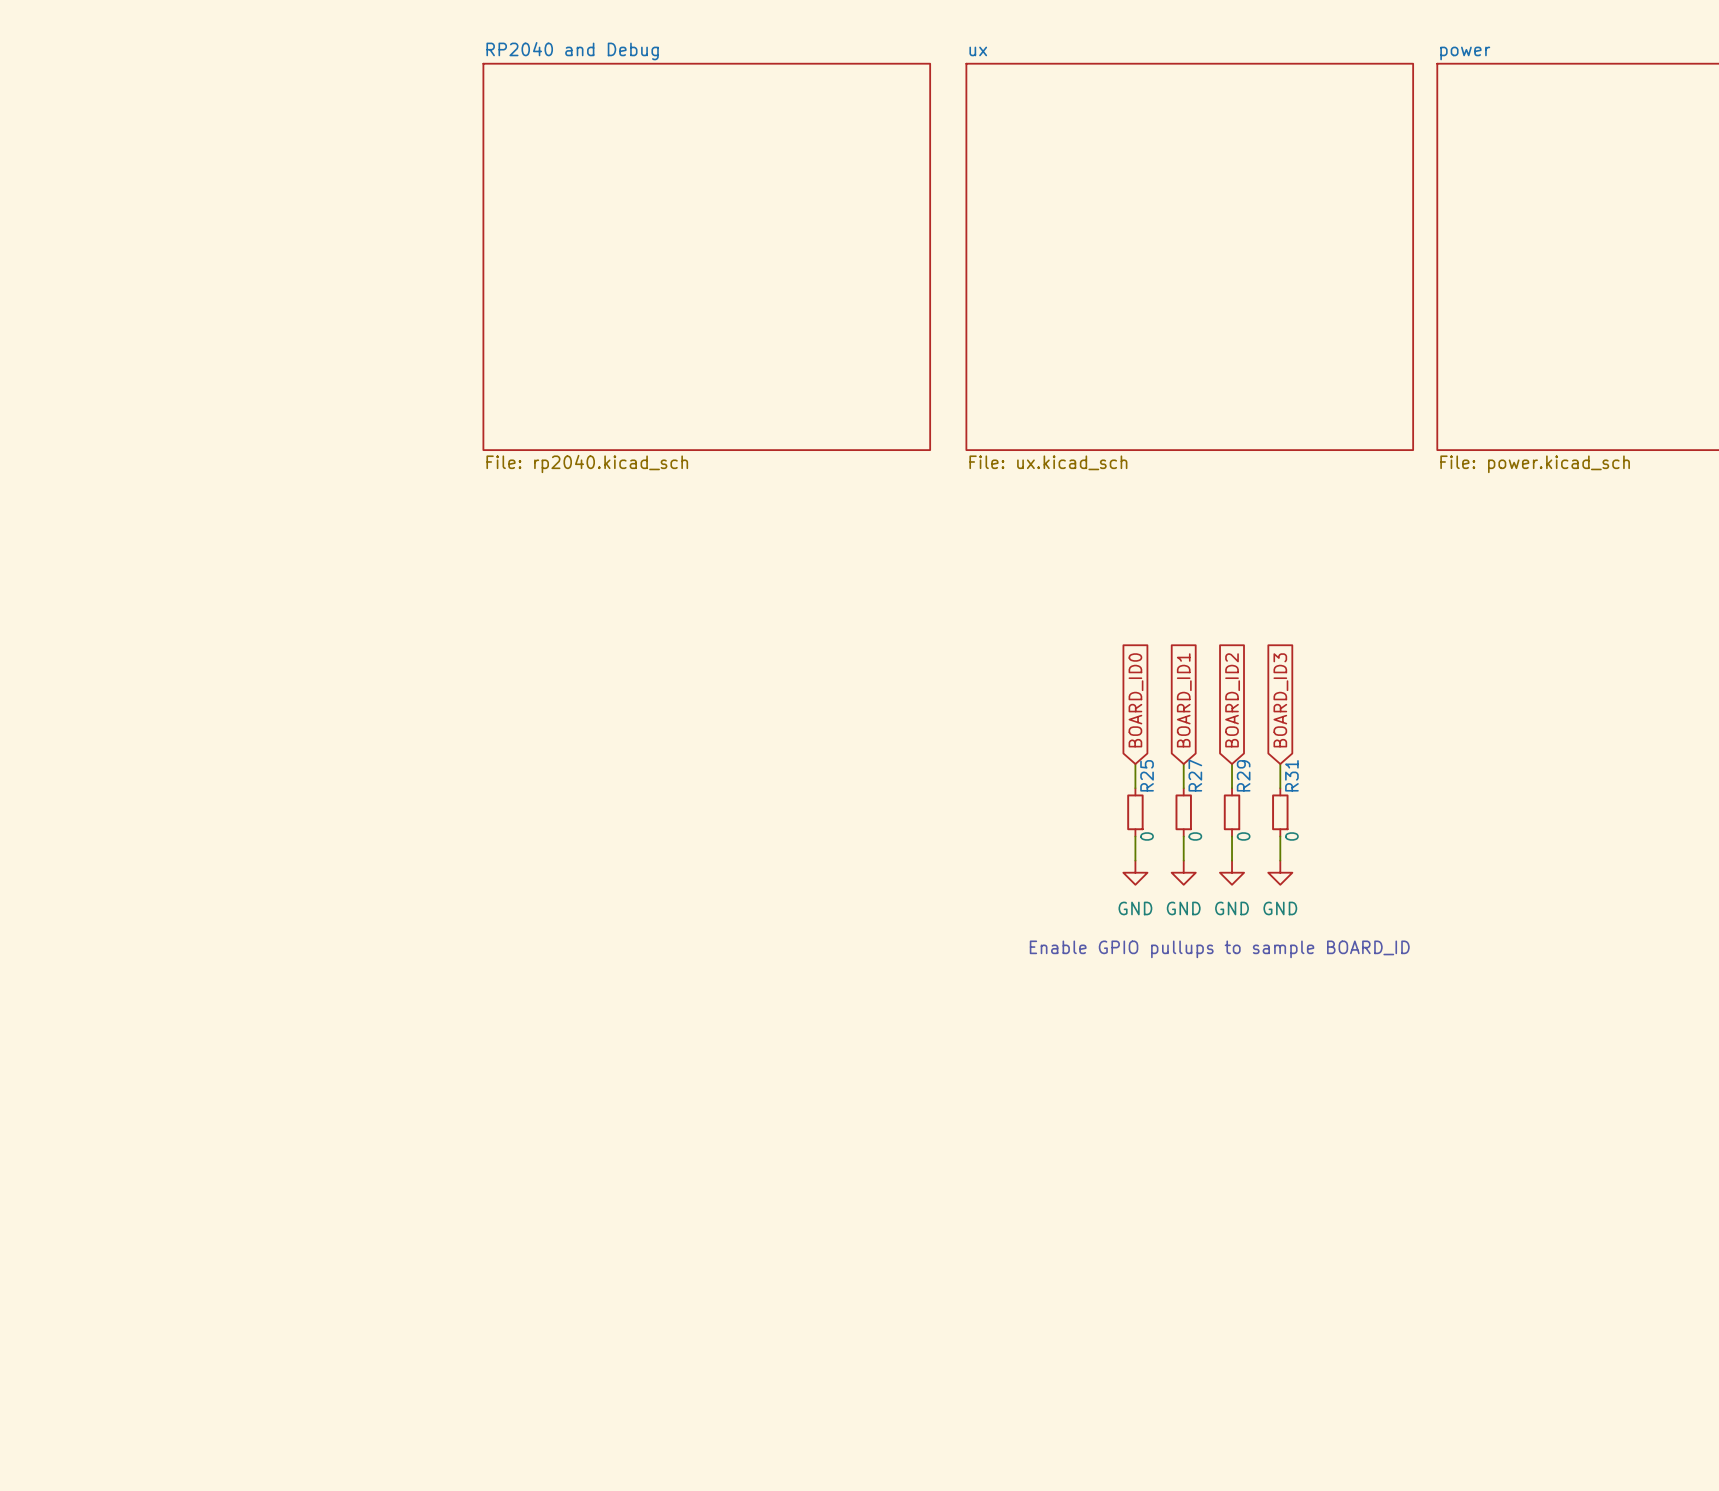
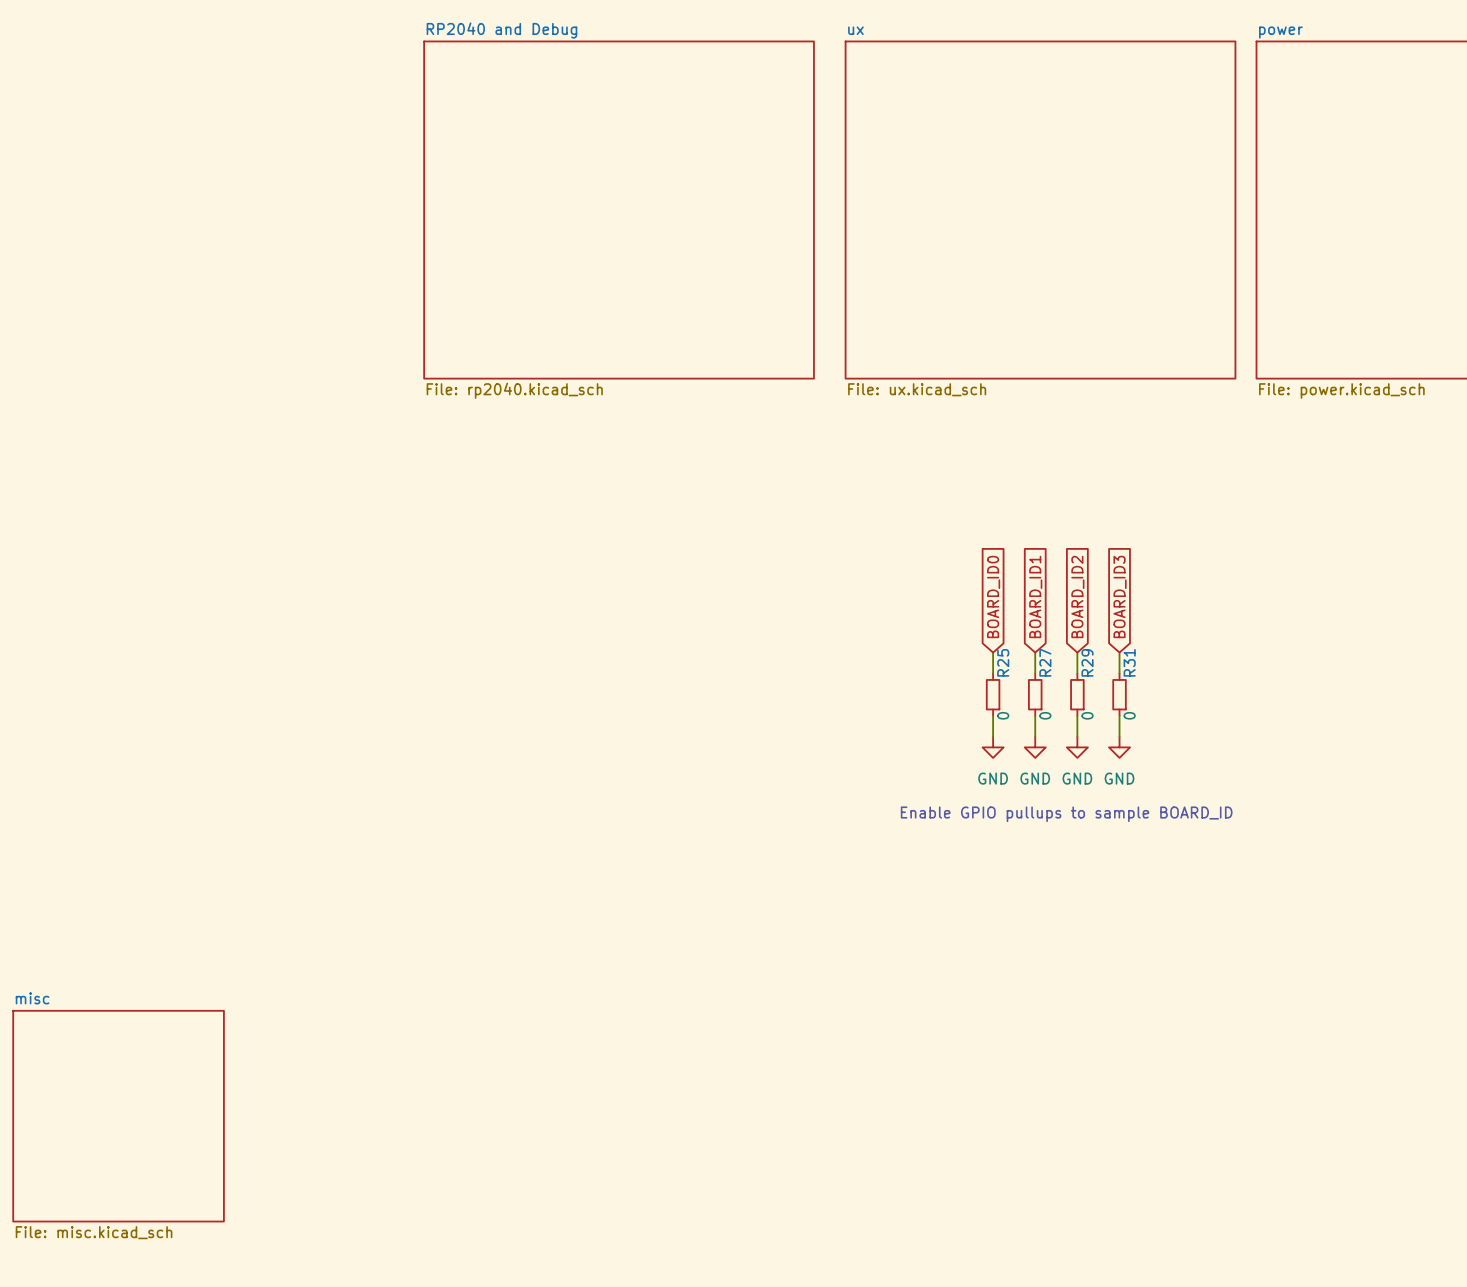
sheet misc: none -> File: misc.kicad_sch (118, 1116)

